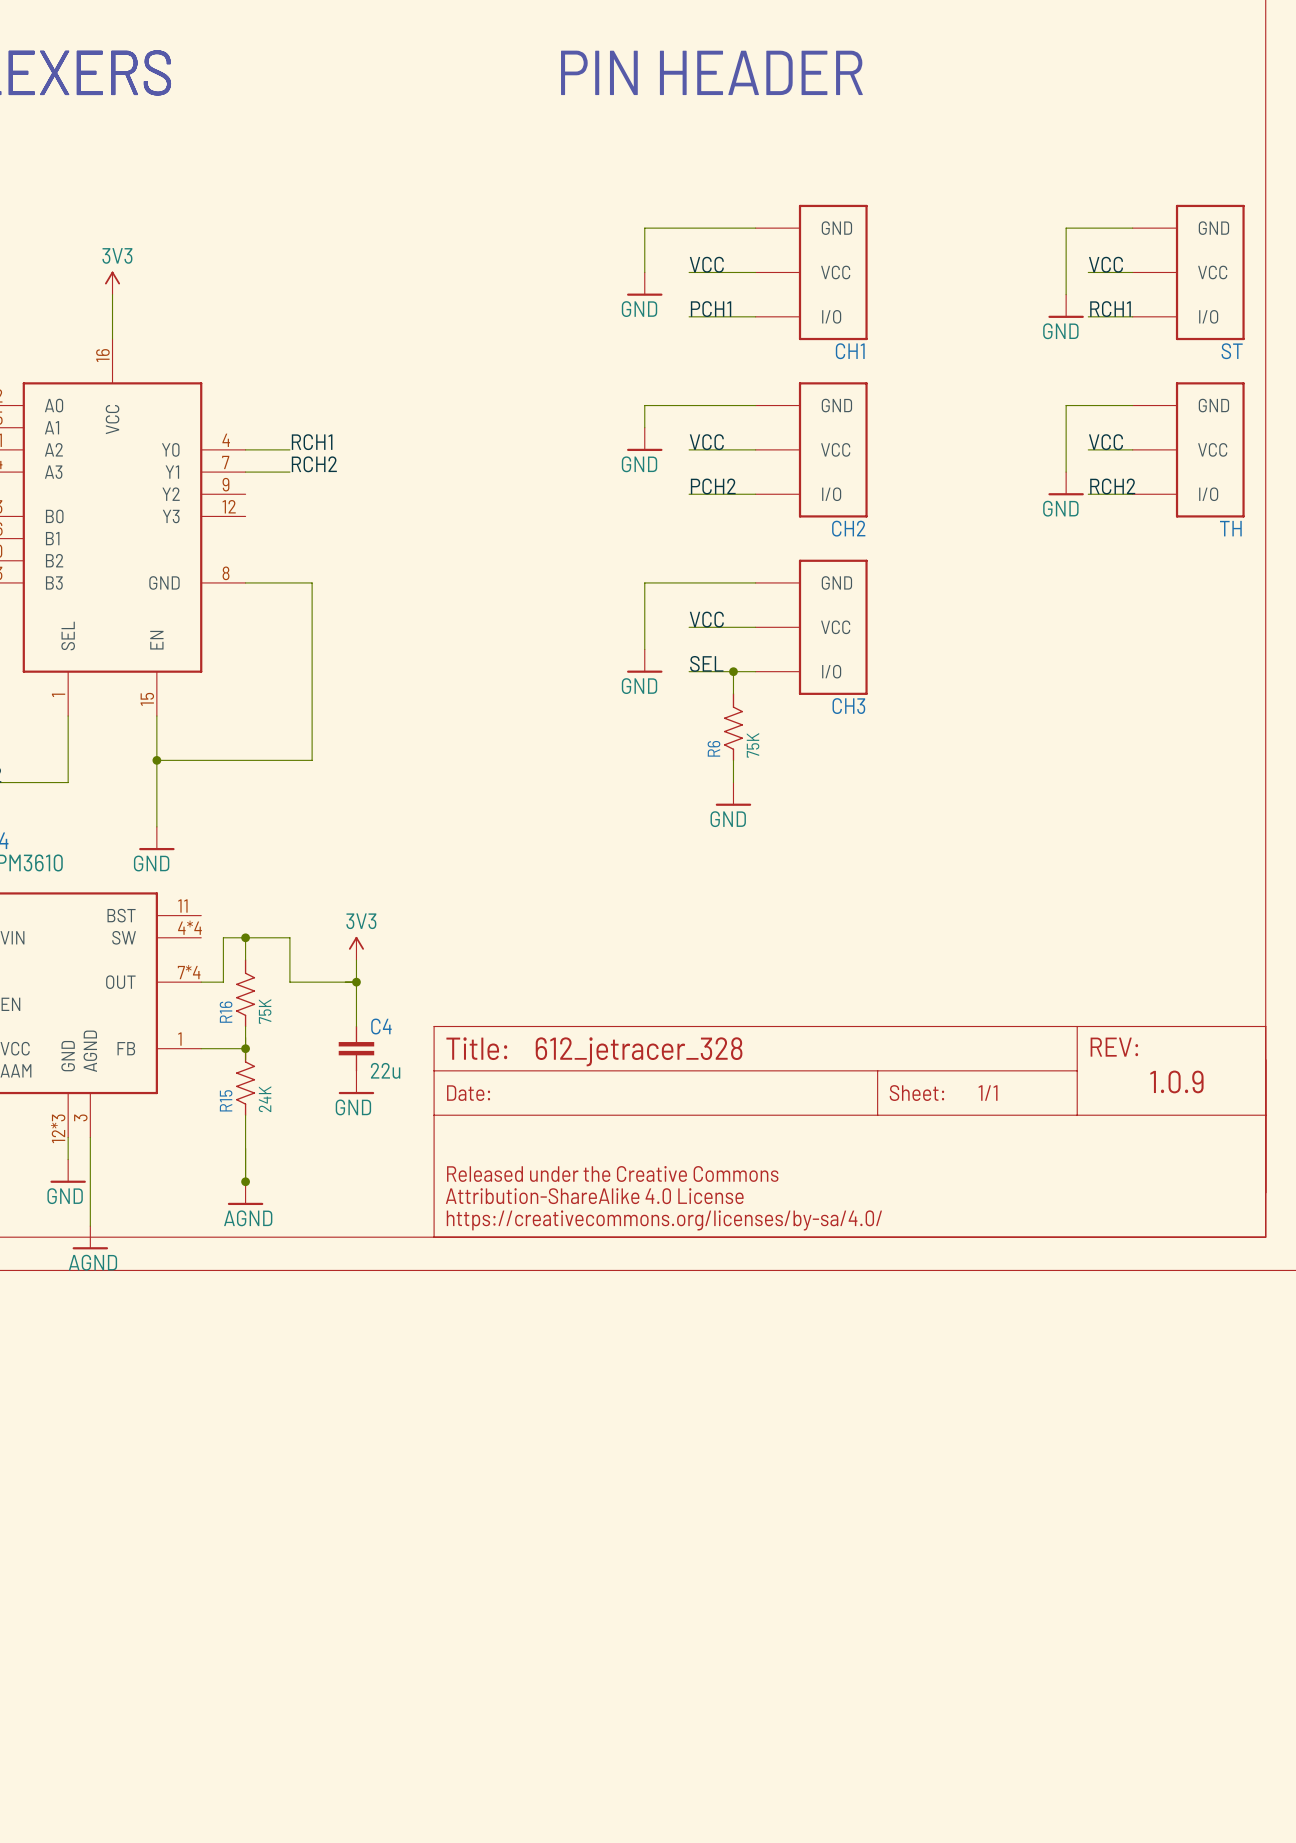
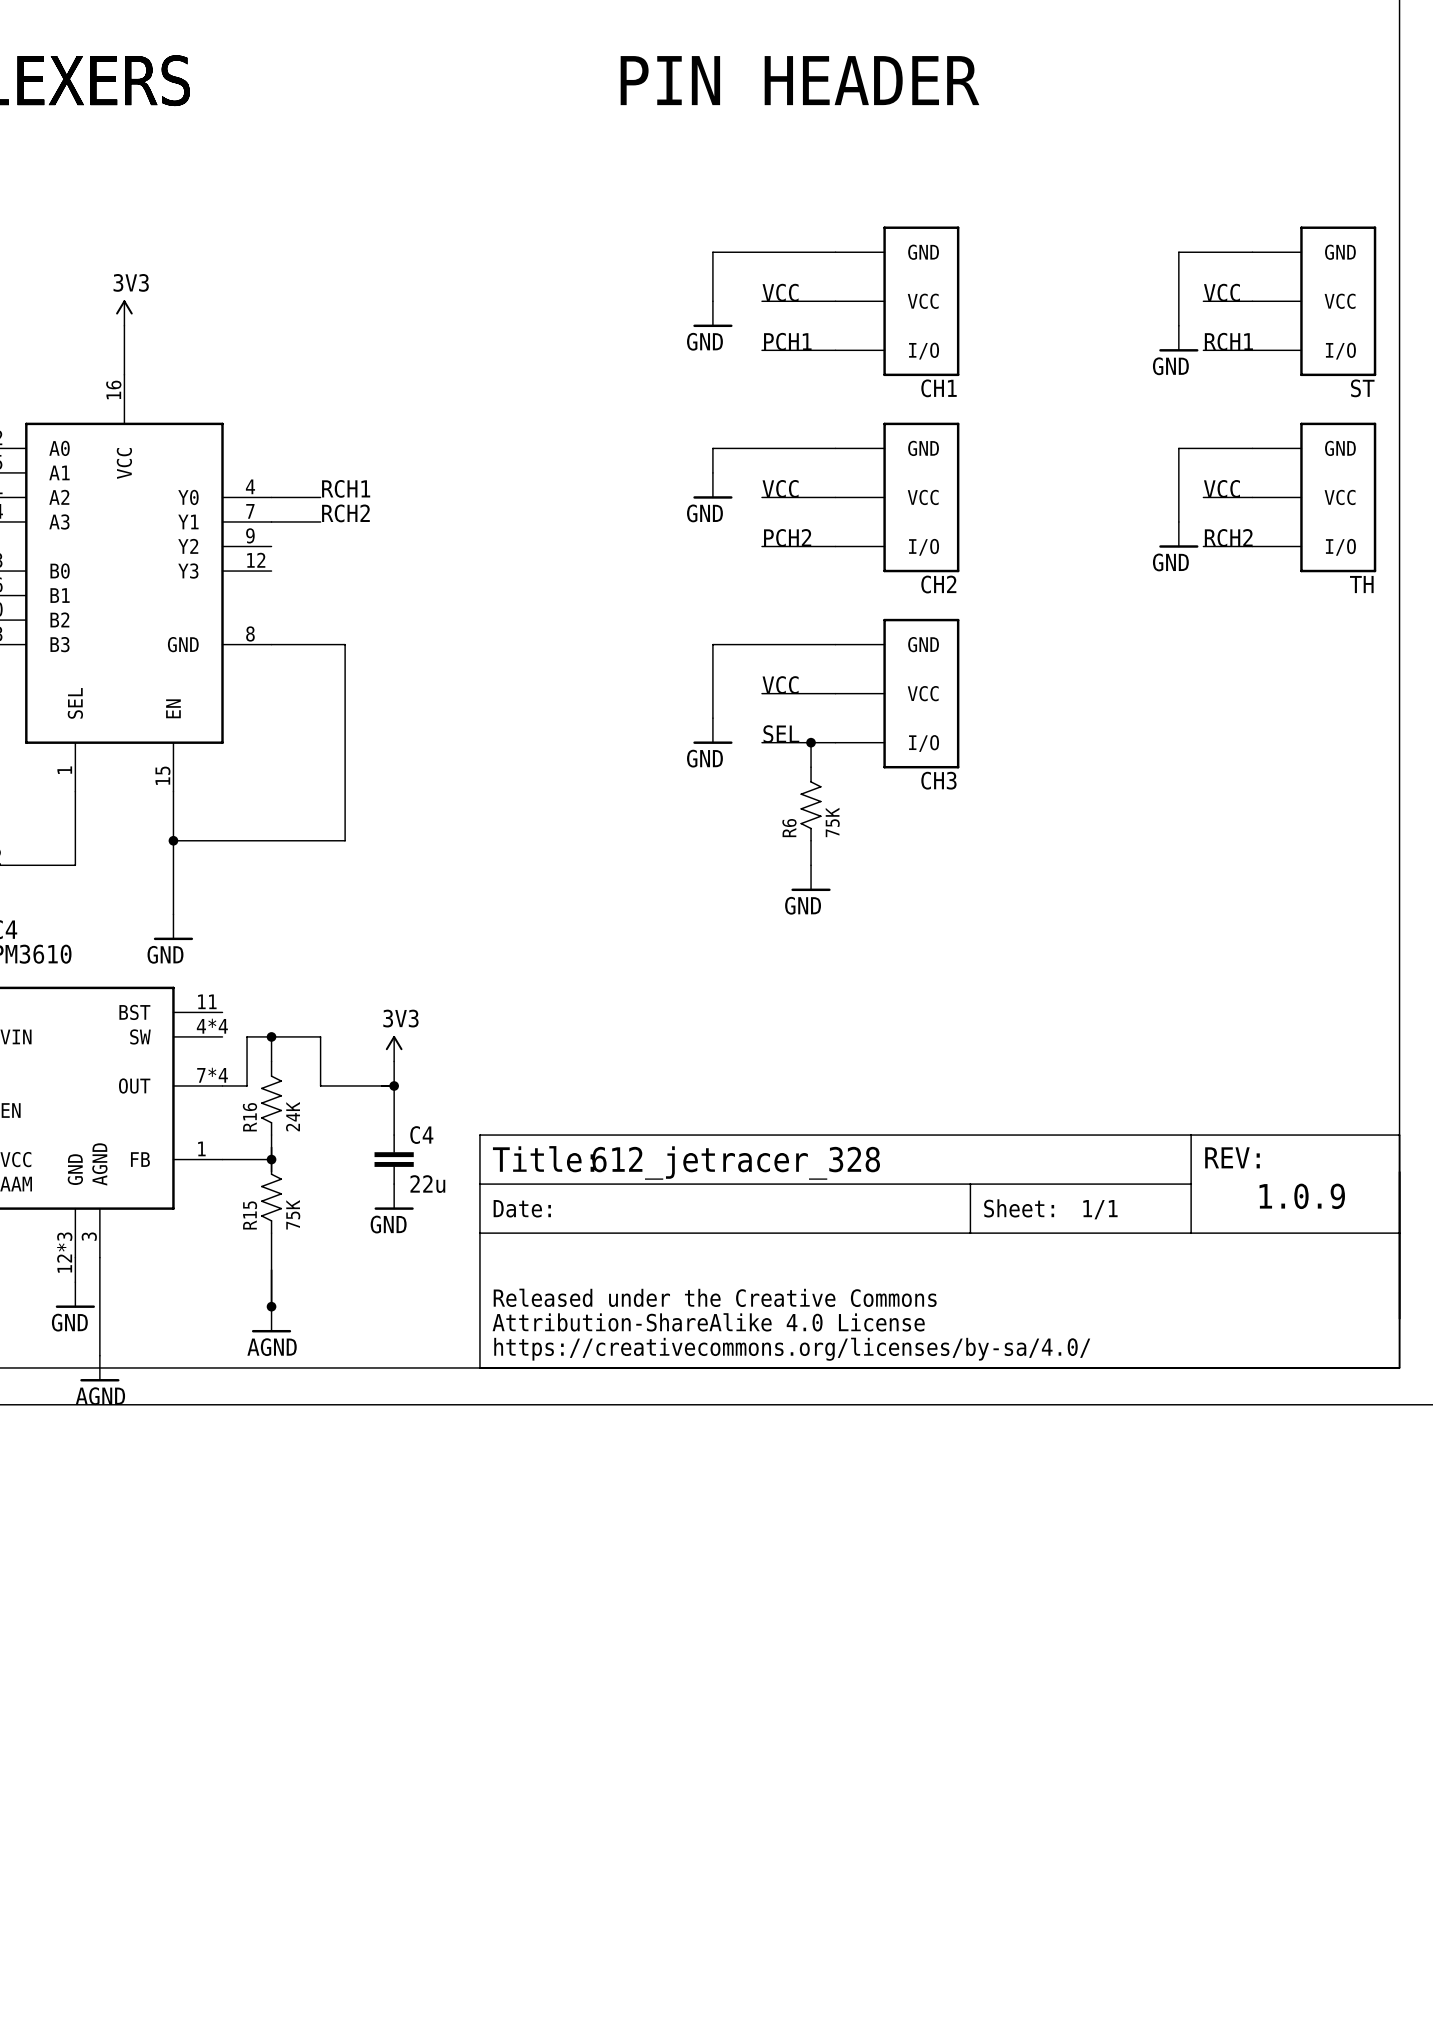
R16 value: 75K (265, 1011) -> 24K (292, 1116)
R15 value: 24K (265, 1099) -> 75K (293, 1214)

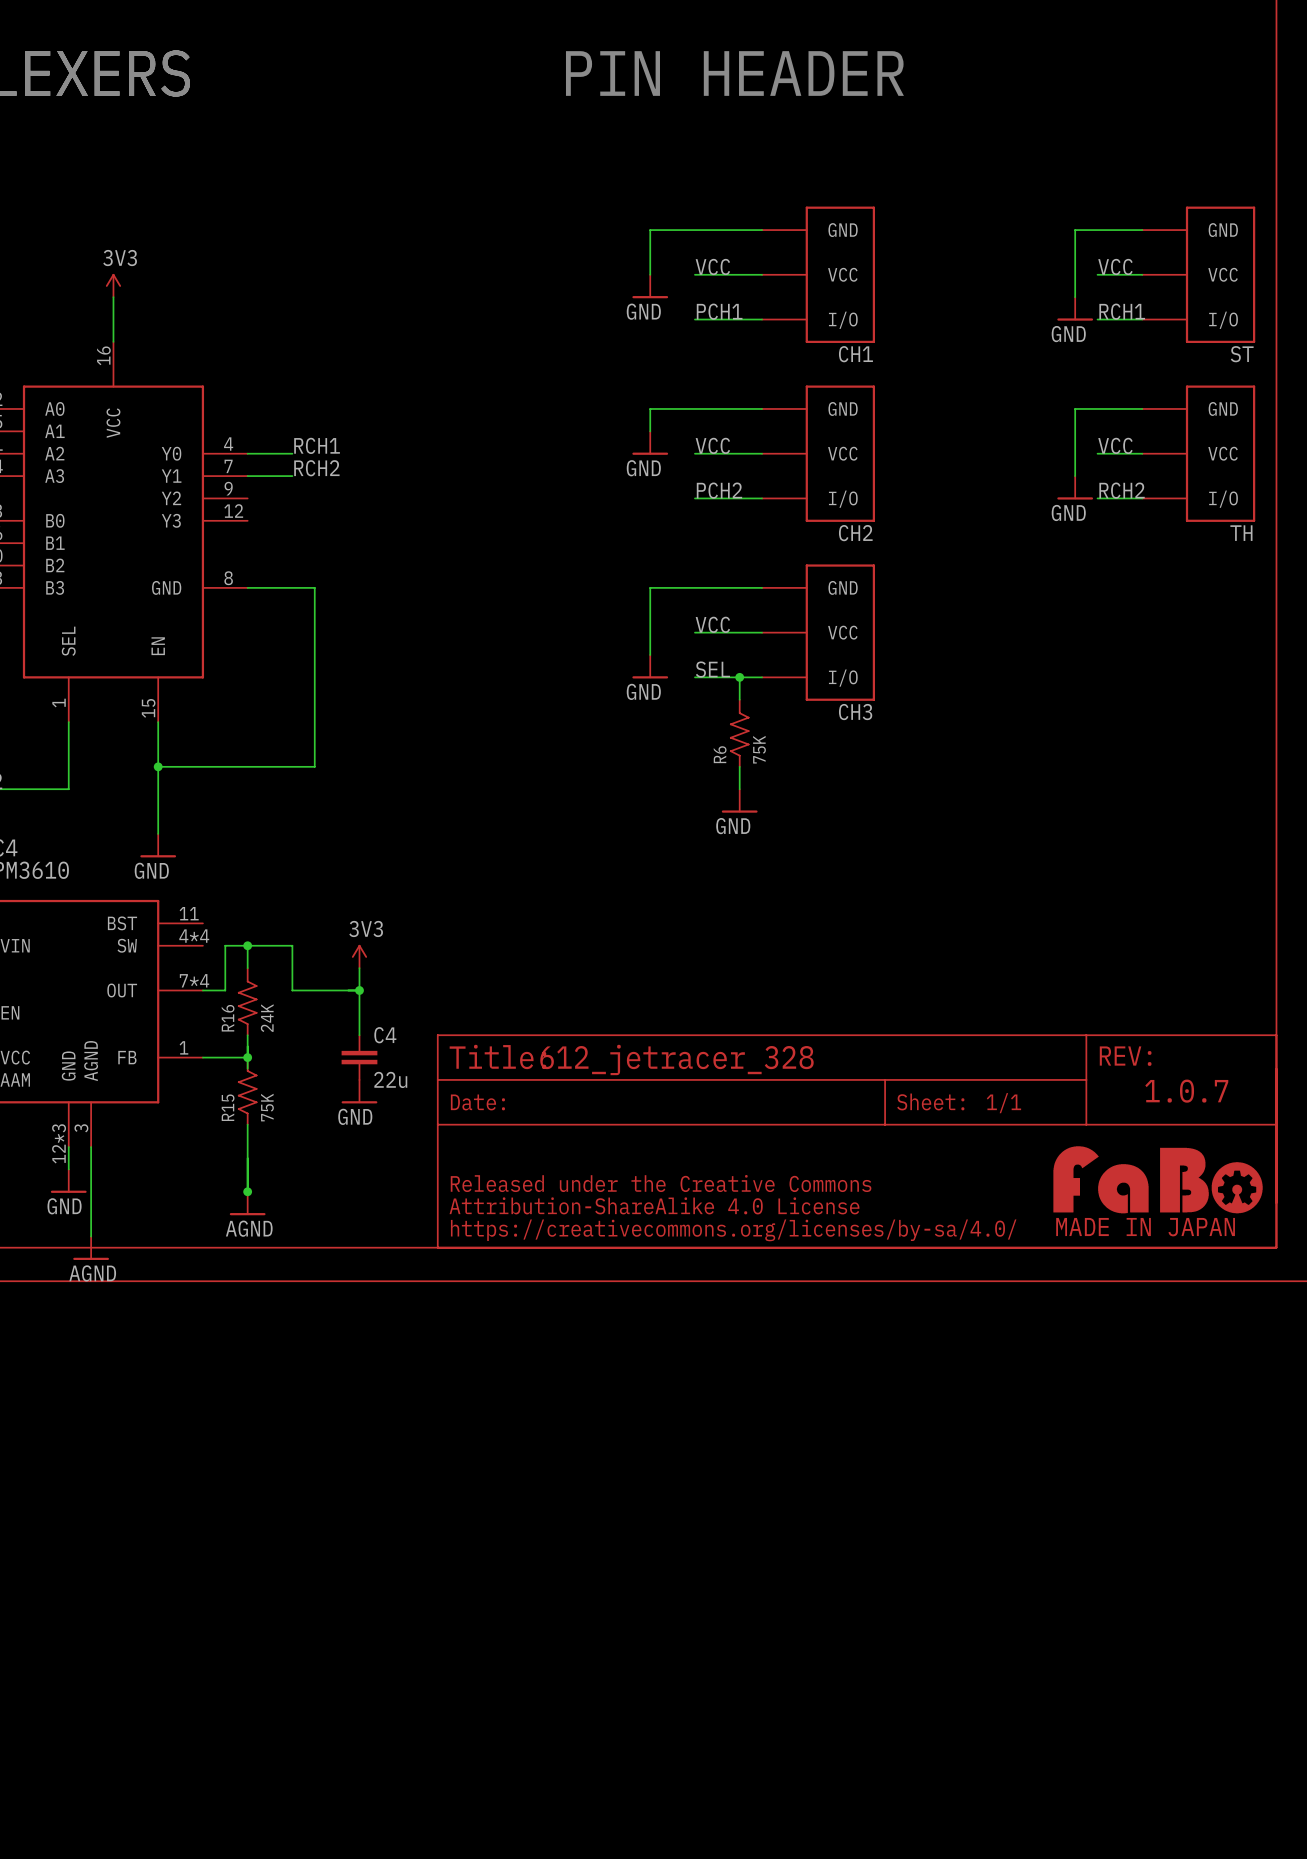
text: 1.0.9 (1302, 1196) -> 1.0.7 (1186, 1091)
part: none -> (1158, 1179)

